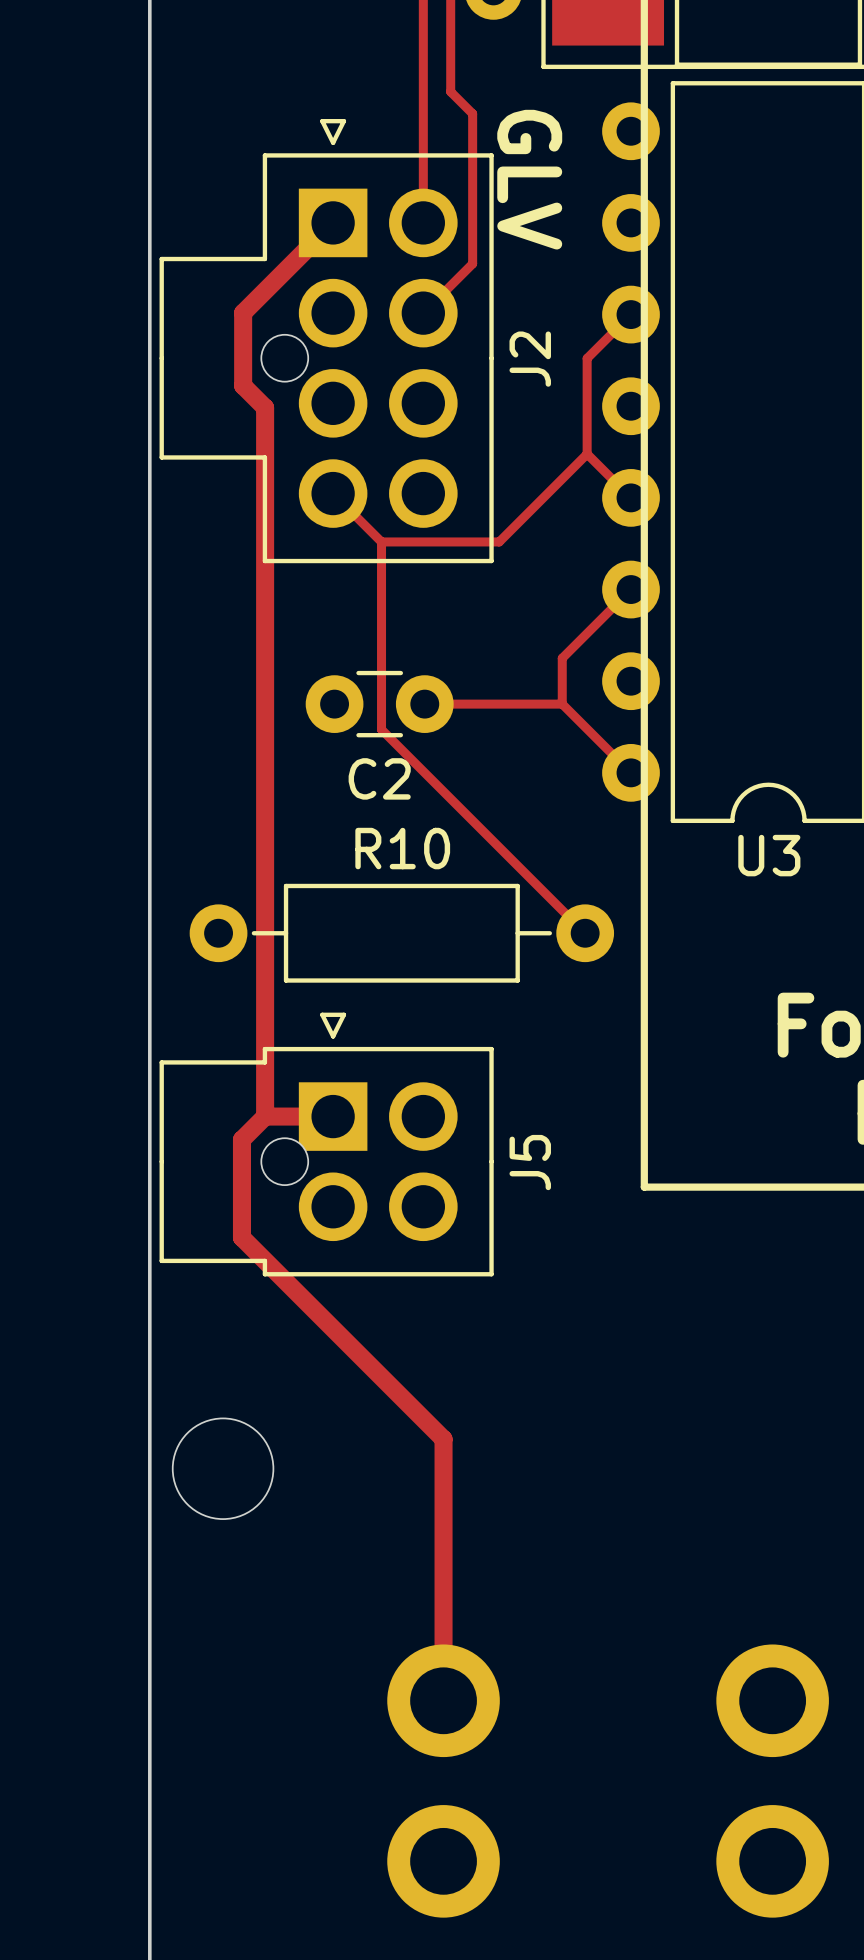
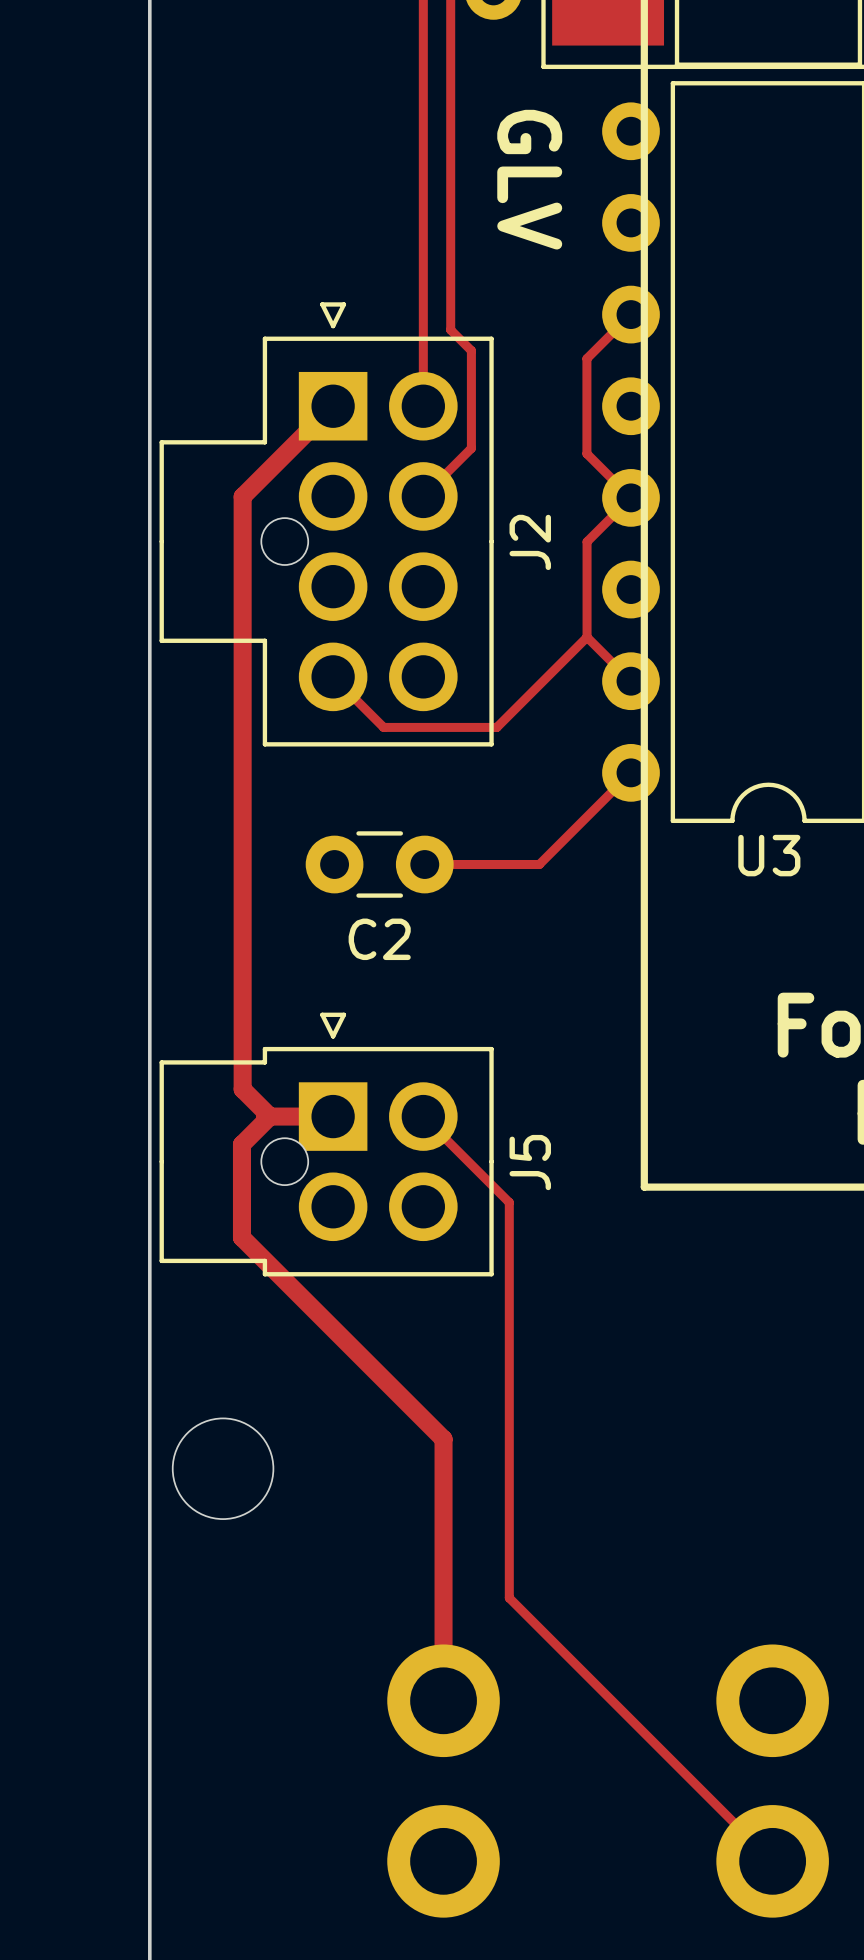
track: (450, 91) (472, 113) (472, 263) (423, 313) -> (450, 91) (450, 330) (471, 350) (471, 448) (423, 496)
track: (333, 222) (243, 312) (243, 385) (265, 407) (265, 1116) (241, 1139) (241, 1144) -> (333, 406) (242, 496) (242, 1089) (269, 1116) (241, 1144)
track: none -> (423, 222) (423, 406)
J2 position: (326, 341) -> (326, 524)
track: (587, 358) (587, 454) (499, 541) (381, 541) -> (586, 358) (586, 453)
track: (333, 493) (381, 541) -> none
track: none -> (631, 497) (587, 541) (587, 637)
track: (381, 541) (381, 729) (585, 933) -> none
track: (631, 589) (562, 658) (562, 704) -> none
track: none -> (587, 637) (496, 727) (383, 727) (333, 676)
track: none -> (587, 637) (631, 681)
C2 position: (379, 704) -> (379, 864)
track: (424, 704) (562, 704) -> none
track: (562, 704) (631, 772) -> (424, 864) (539, 864) (631, 772)
R10: (401, 933) -> none
track: none -> (423, 1116) (509, 1202) (509, 1598) (772, 1861)

